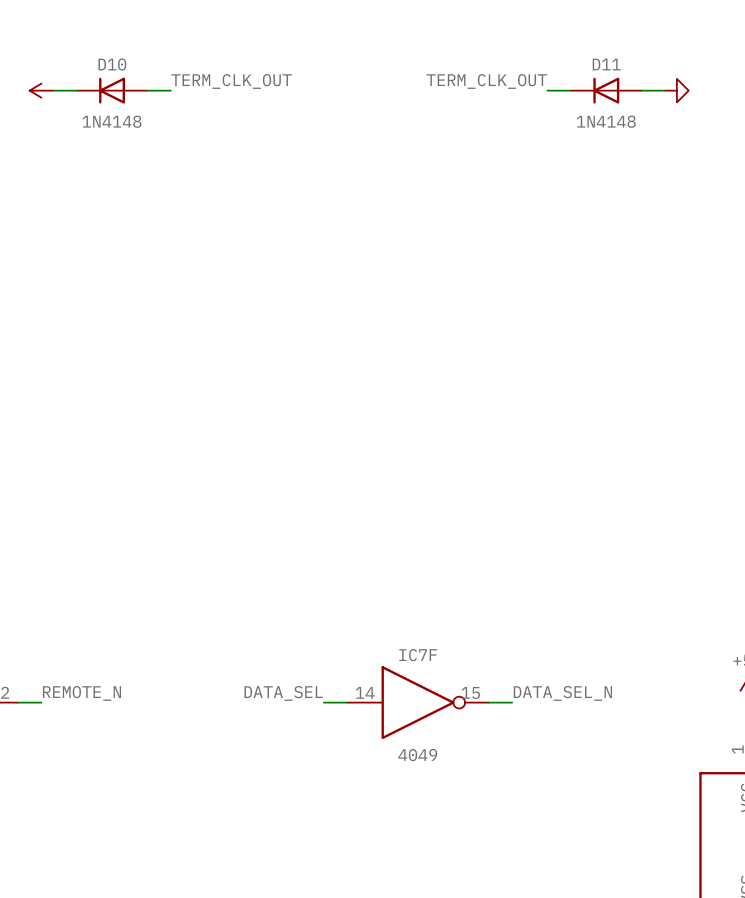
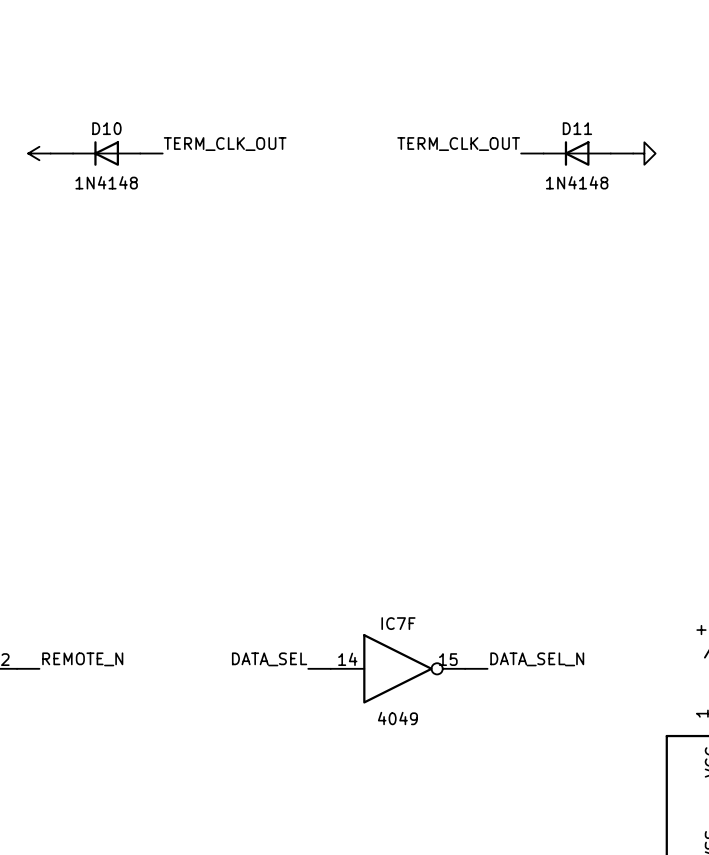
label position: TERM_CLK_OUT (231, 81) -> TERM_CLK_OUT (225, 144)
label position: TERM_CLK_OUT (486, 81) -> TERM_CLK_OUT (458, 144)
power symbol position: (41, 90) -> (39, 153)
wire: (53, 90) (76, 90) -> (50, 153) (73, 153)
D10 position: (112, 90) -> (106, 153)
wire: (147, 90) (170, 90) -> (140, 153) (162, 153)
wire: (547, 90) (571, 90) -> (521, 153) (543, 153)
D11 position: (606, 90) -> (577, 153)
wire: (641, 90) (665, 90) -> (610, 153) (633, 153)
power symbol position: (676, 90) -> (644, 153)

